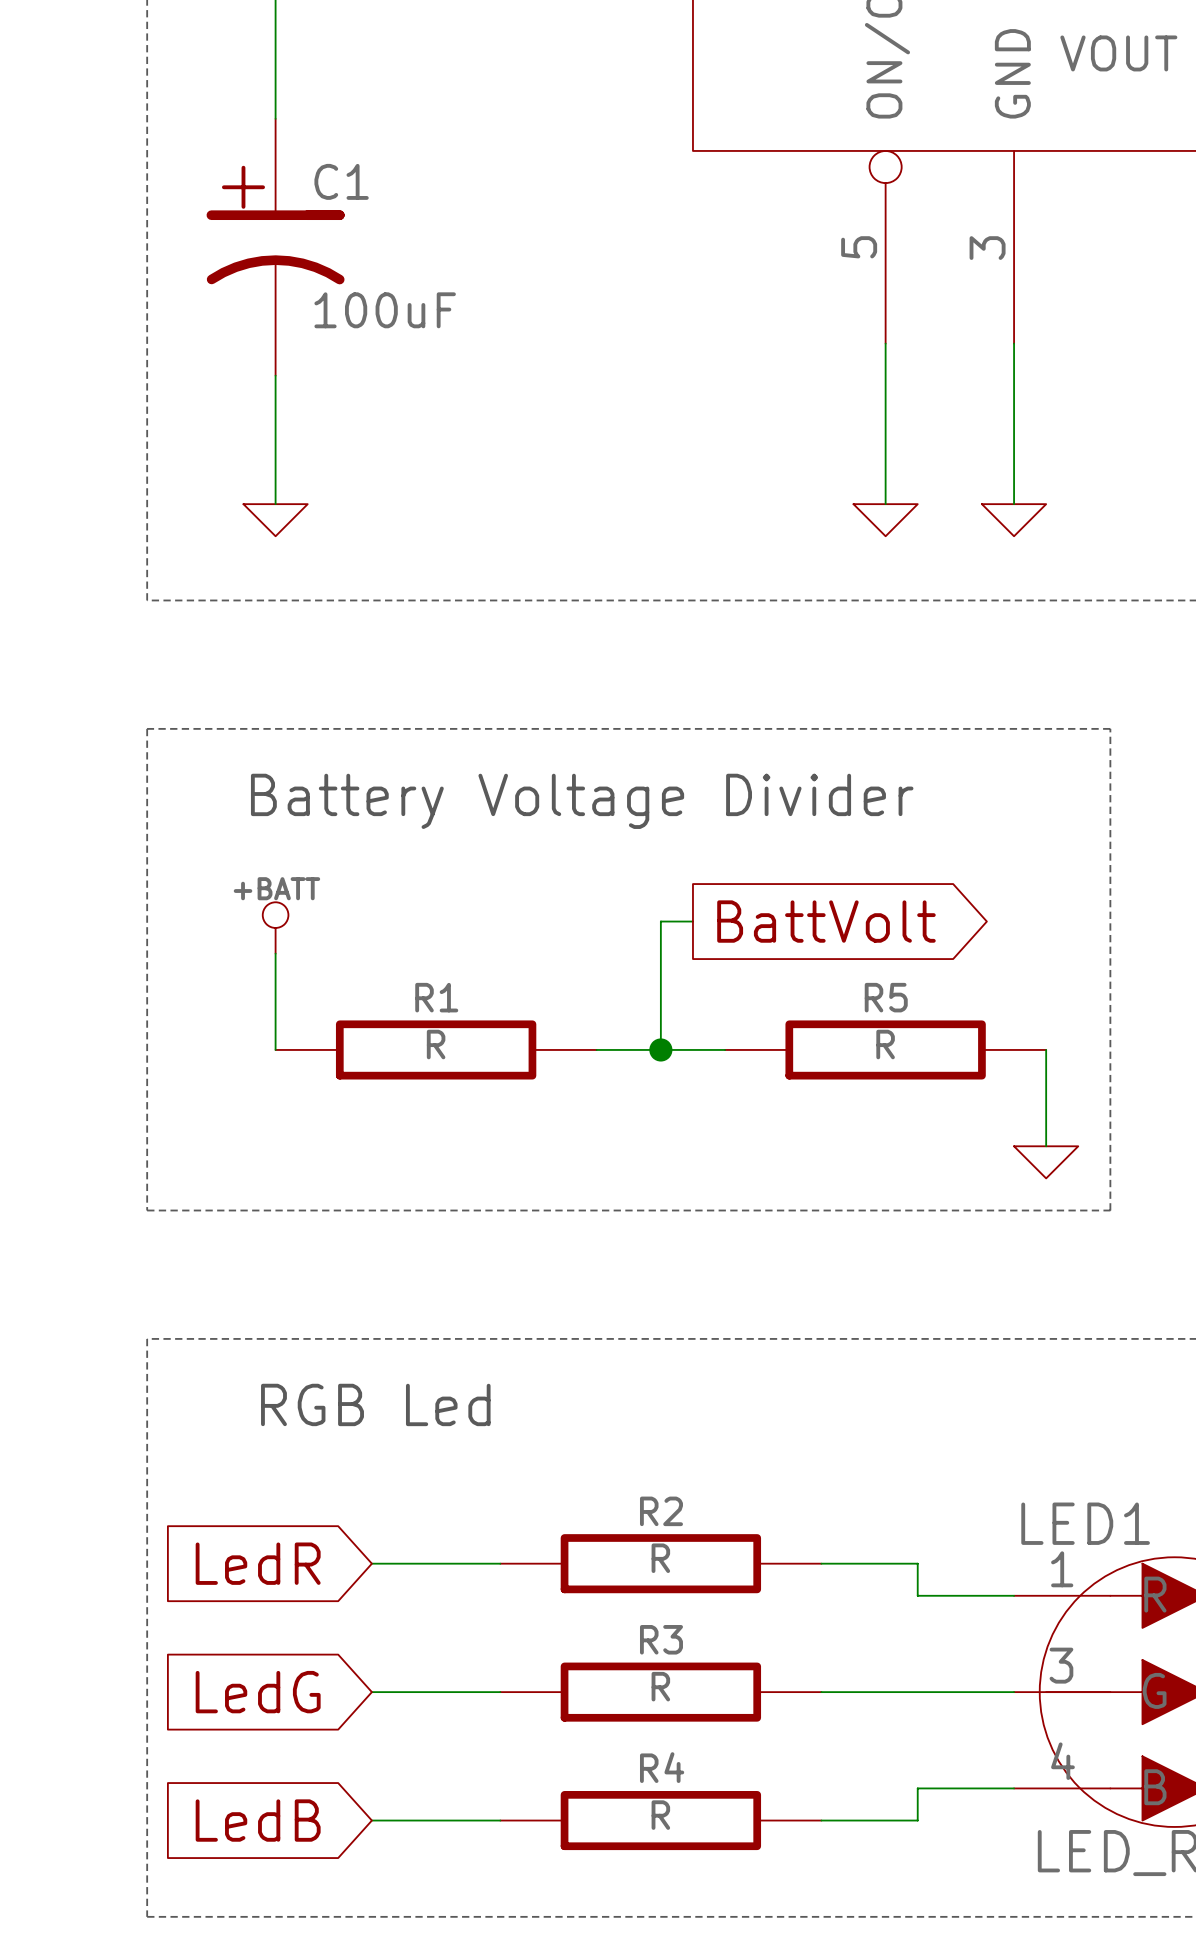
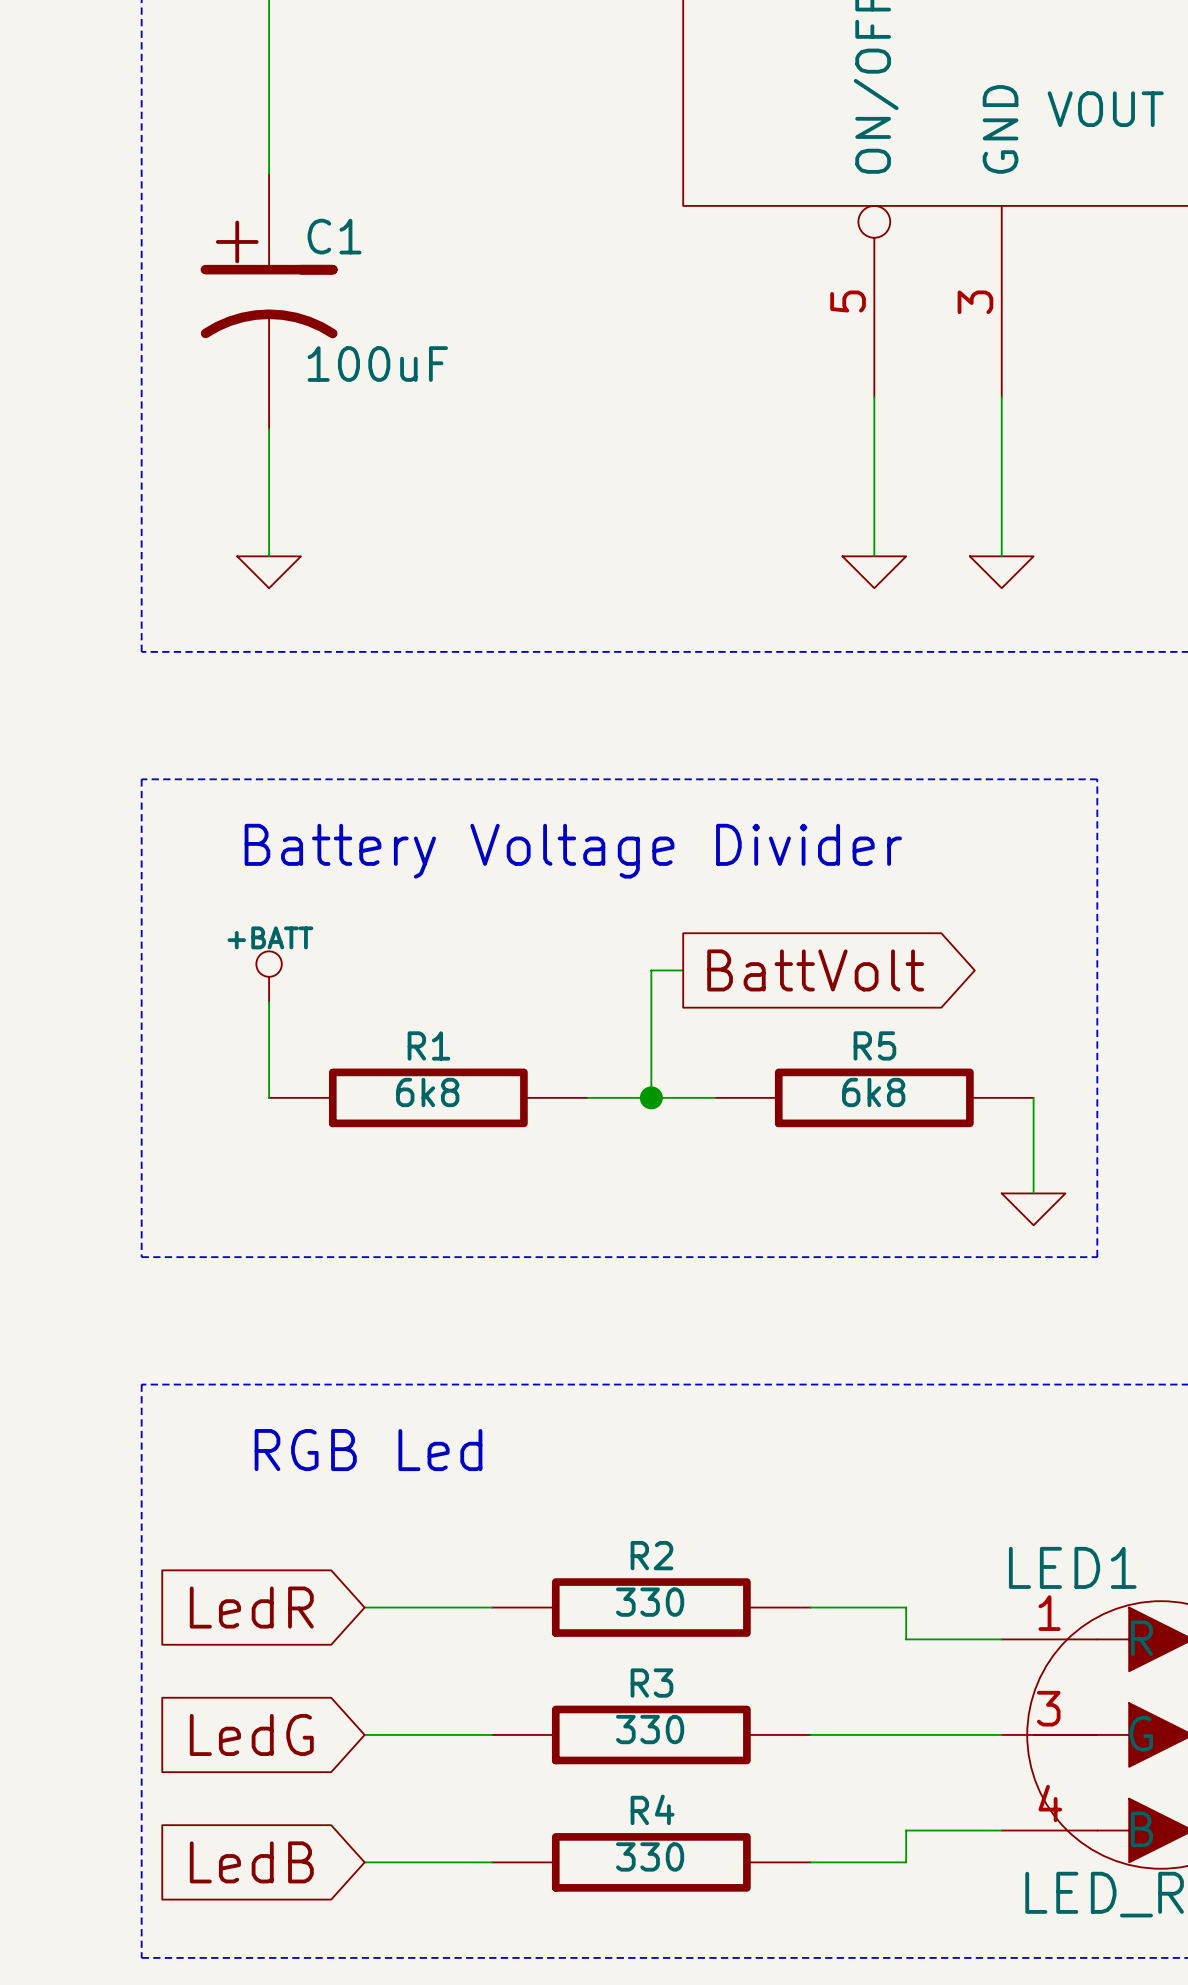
R1 value: R (436, 1044) -> 6k8 (427, 1092)
R5 value: R (885, 1044) -> 6k8 (873, 1092)
R2 value: R (660, 1558) -> 330 (650, 1602)
R3 value: R (660, 1686) -> 330 (650, 1729)
R4 value: R (660, 1815) -> 330 (650, 1856)

